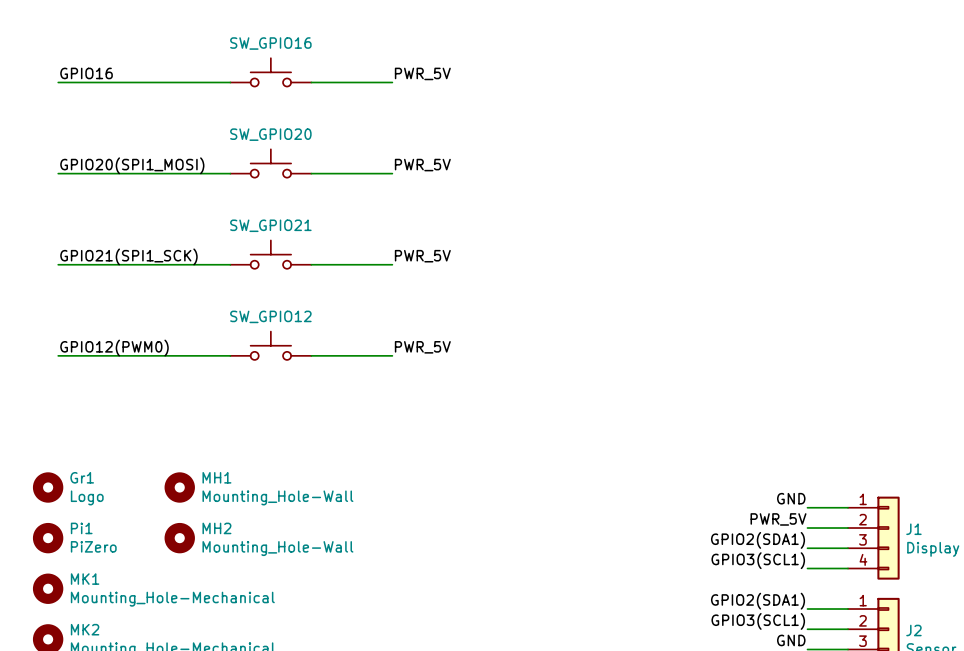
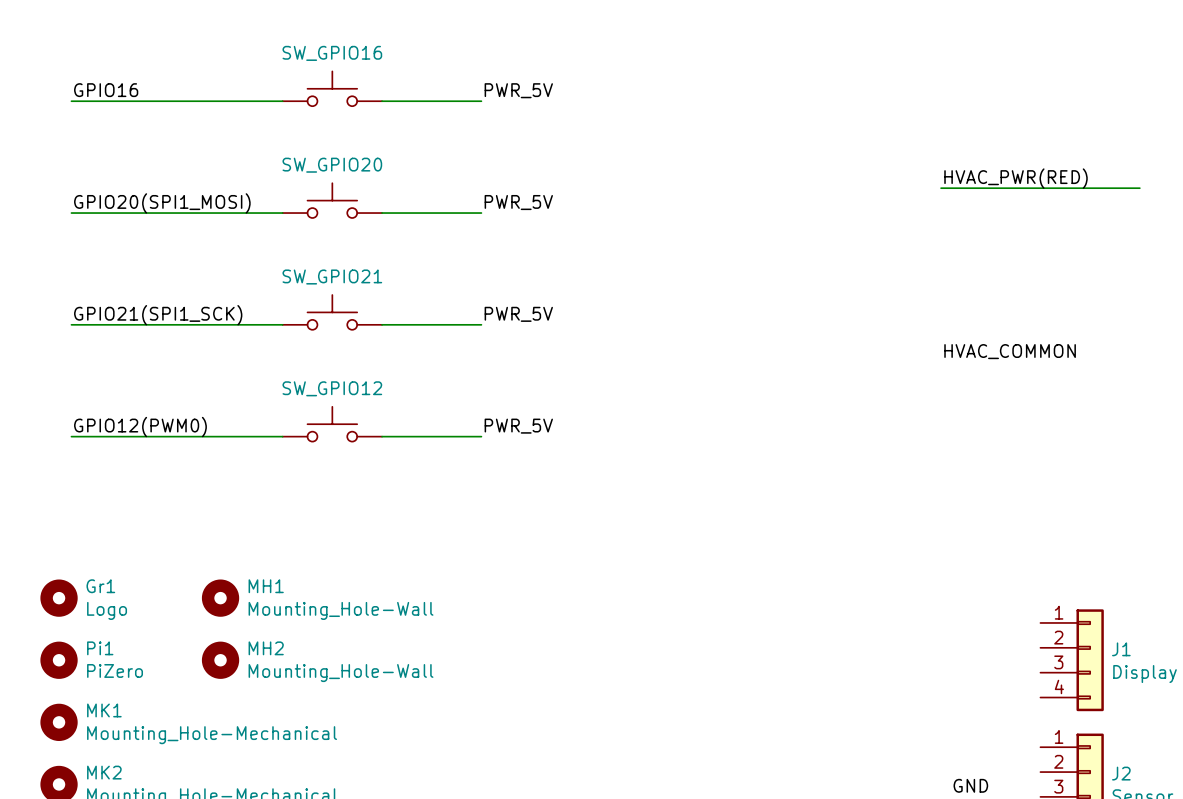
label: none -> HVAC_PWR(RED) (1016, 178)
wire: none -> (941, 188) (1139, 188)
label: none -> HVAC_COMMON (1010, 351)
label: GND (791, 498) -> none
wire: (807, 507) (848, 507) -> none
label: PWR_5V (778, 519) -> none
wire: (807, 528) (848, 528) -> none
label: GPIO2(SDA1) (758, 540) -> none
wire: (807, 548) (848, 548) -> none
label: GPIO3(SCL1) (758, 560) -> none
wire: (807, 568) (848, 568) -> none
label: GPIO2(SDA1) (758, 601) -> none
wire: (807, 609) (848, 609) -> none
label: GPIO3(SCL1) (758, 621) -> none
wire: (807, 629) (848, 629) -> none
wire: (807, 649) (848, 649) -> none

